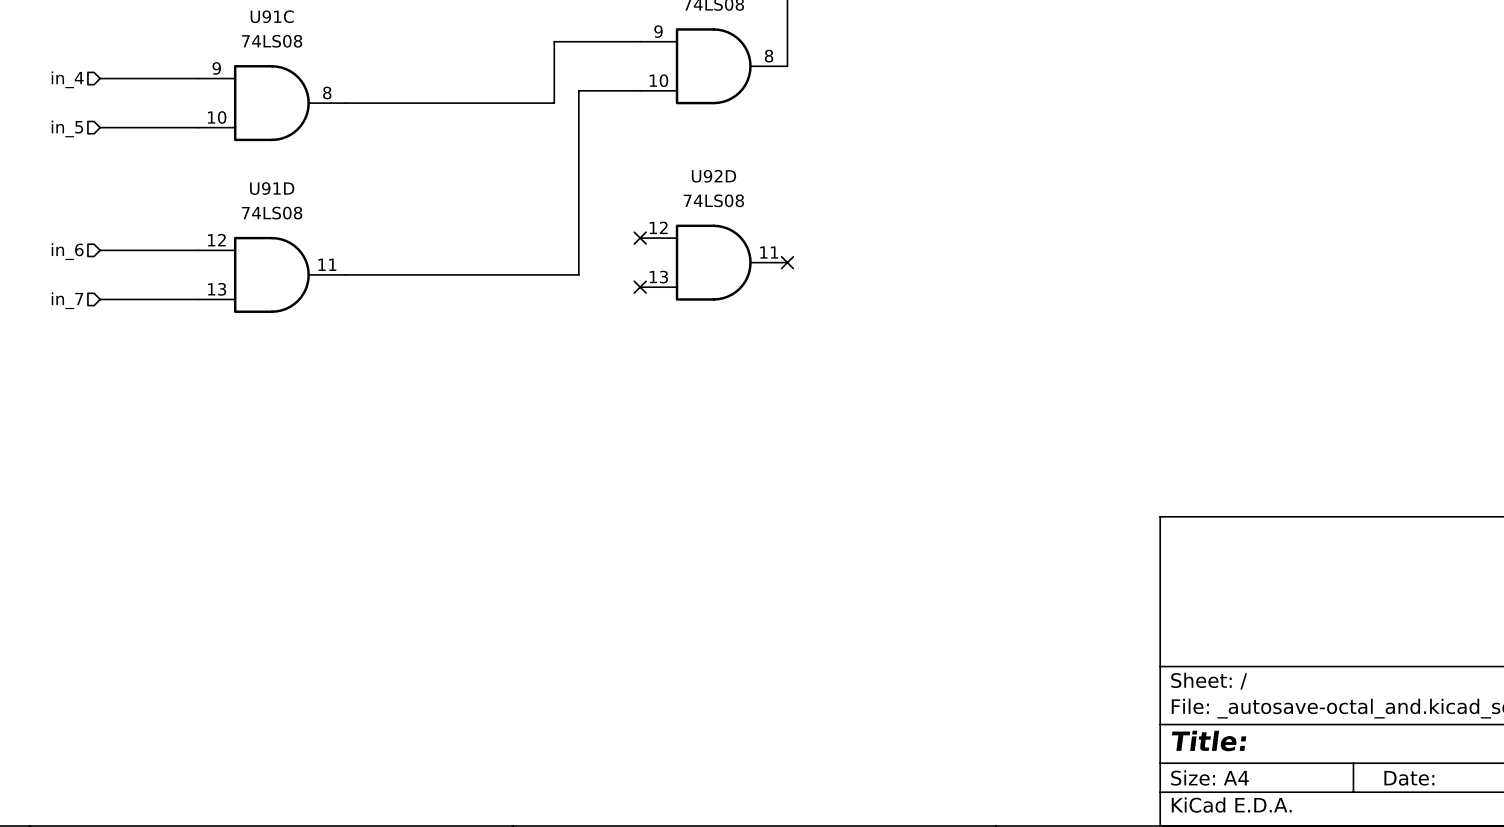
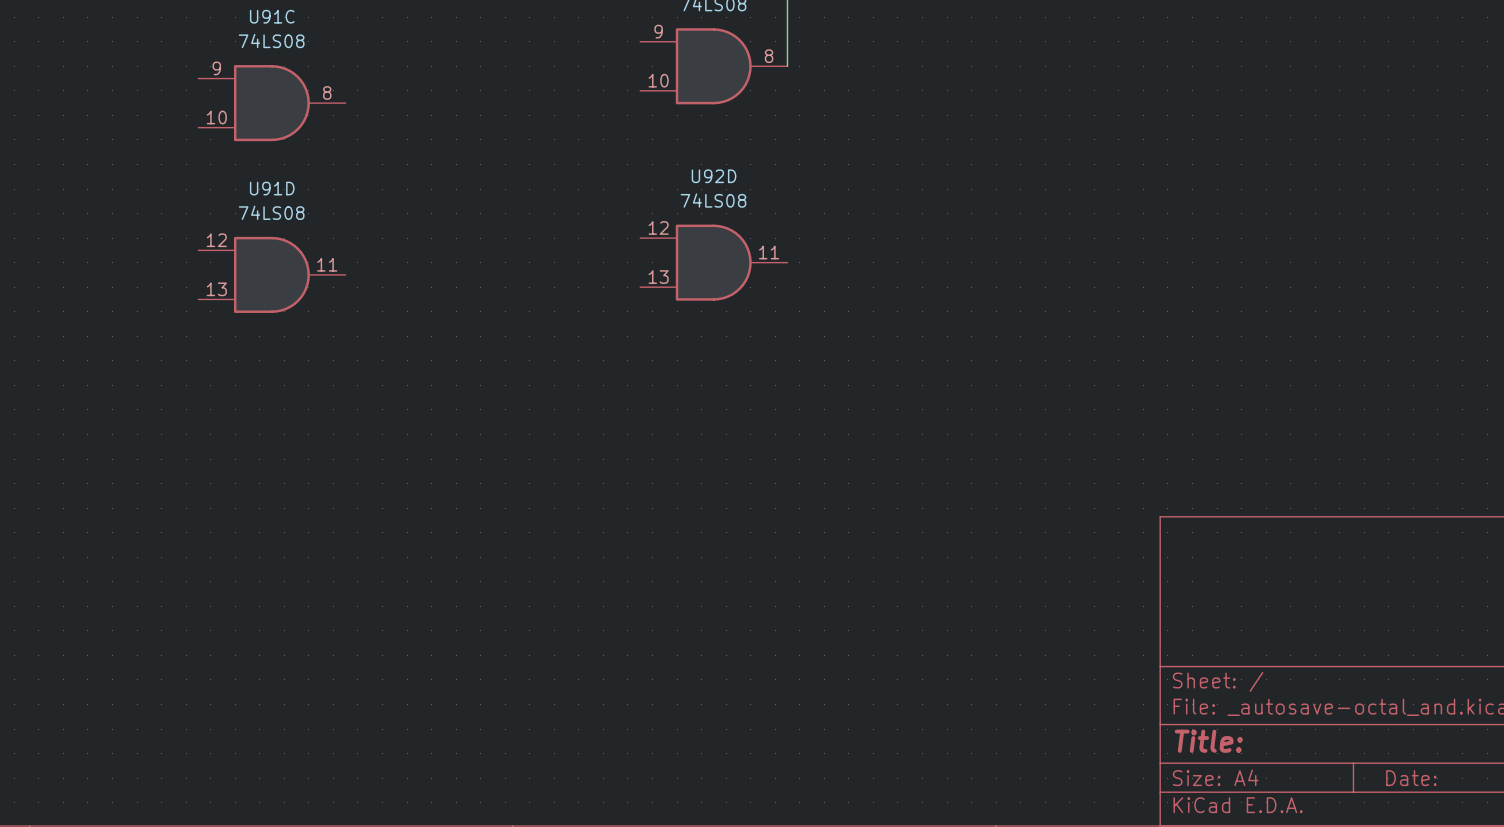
wire: (640, 41) (554, 41) (554, 103) (345, 103) -> none
wire: (100, 78) (198, 78) -> none
hierarchical label: in_4 (67, 79) -> none
wire: (640, 90) (578, 90) (578, 274) (345, 274) -> none
wire: (100, 127) (198, 127) -> none
hierarchical label: in_5 (67, 128) -> none
no-connect mark: (640, 238) -> none
wire: (100, 250) (198, 250) -> none
hierarchical label: in_6 (67, 251) -> none
no-connect mark: (787, 262) -> none
no-connect mark: (640, 287) -> none
wire: (100, 299) (198, 299) -> none
hierarchical label: in_7 (67, 300) -> none

